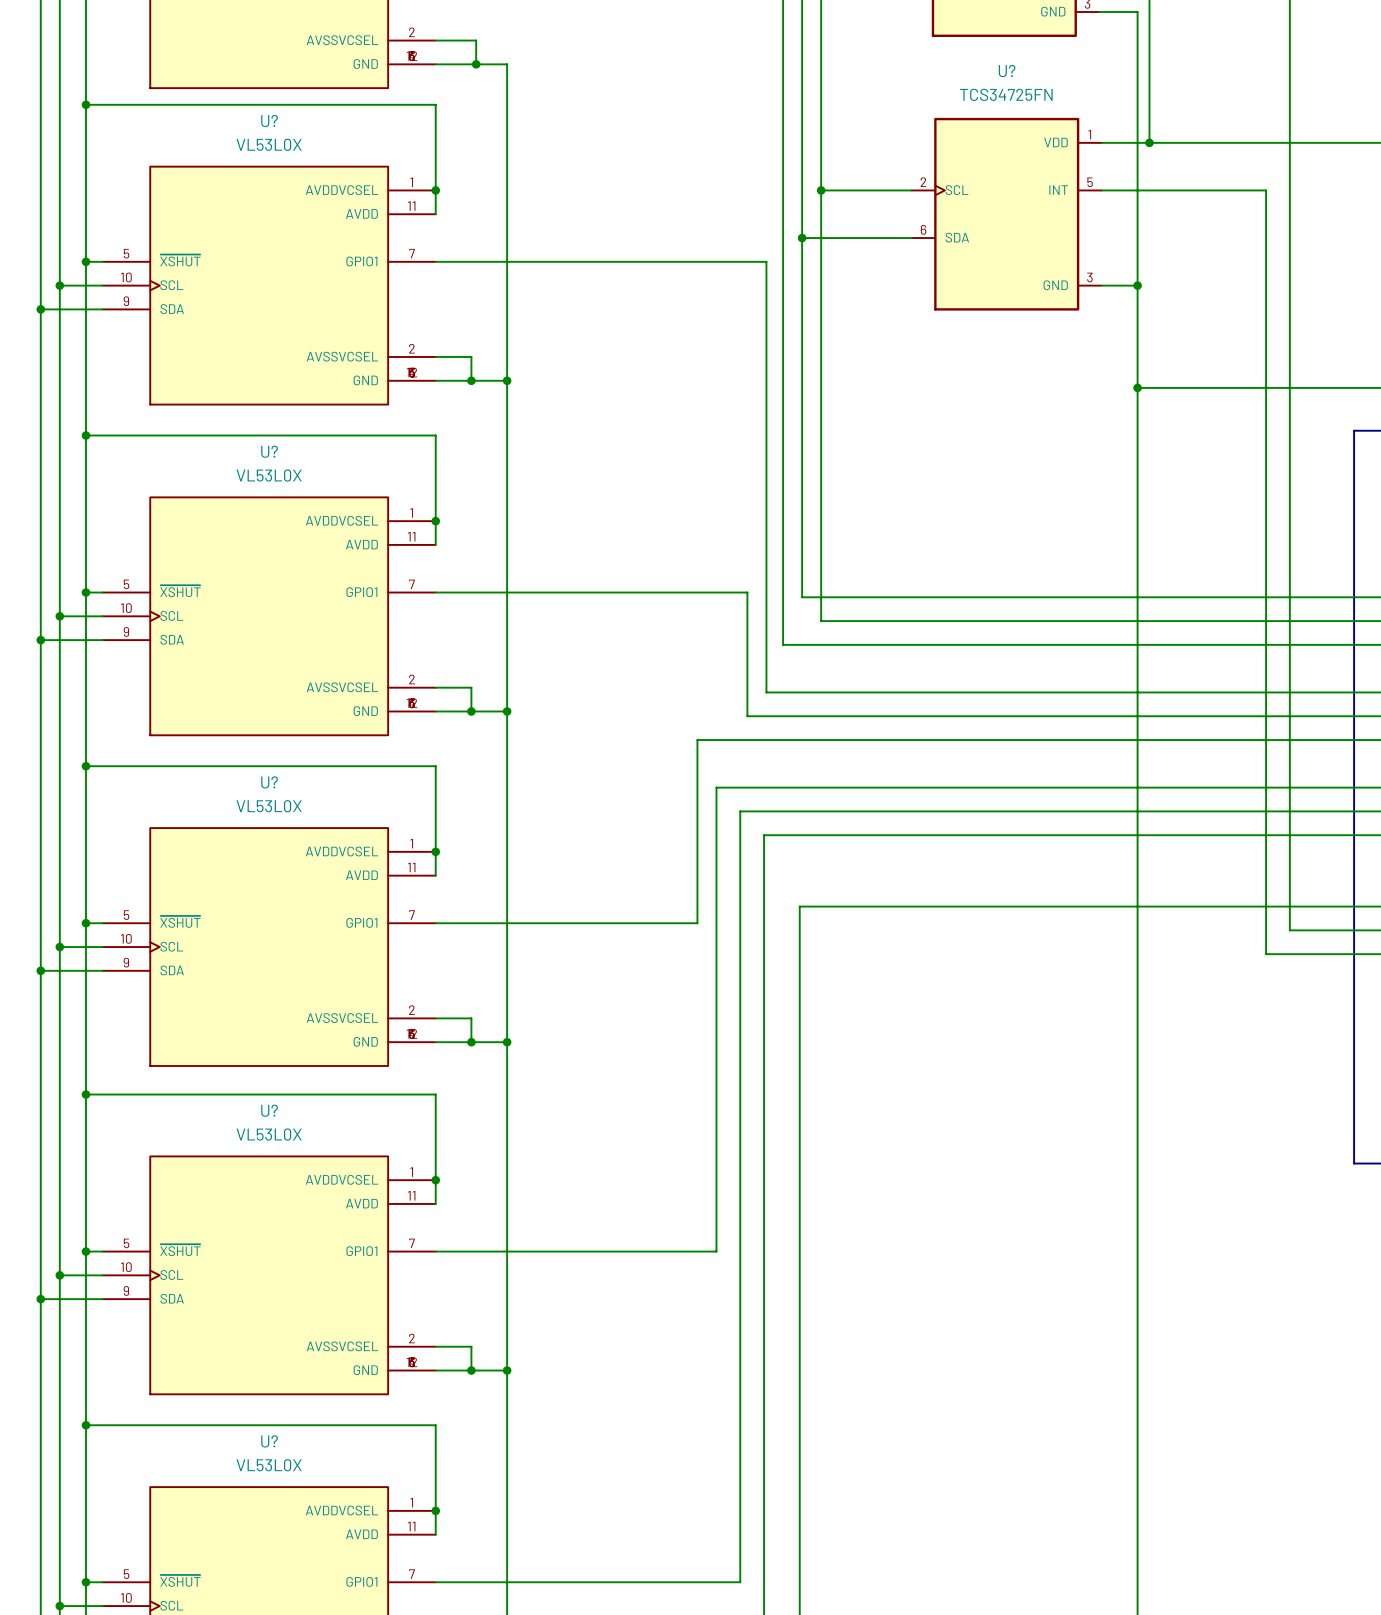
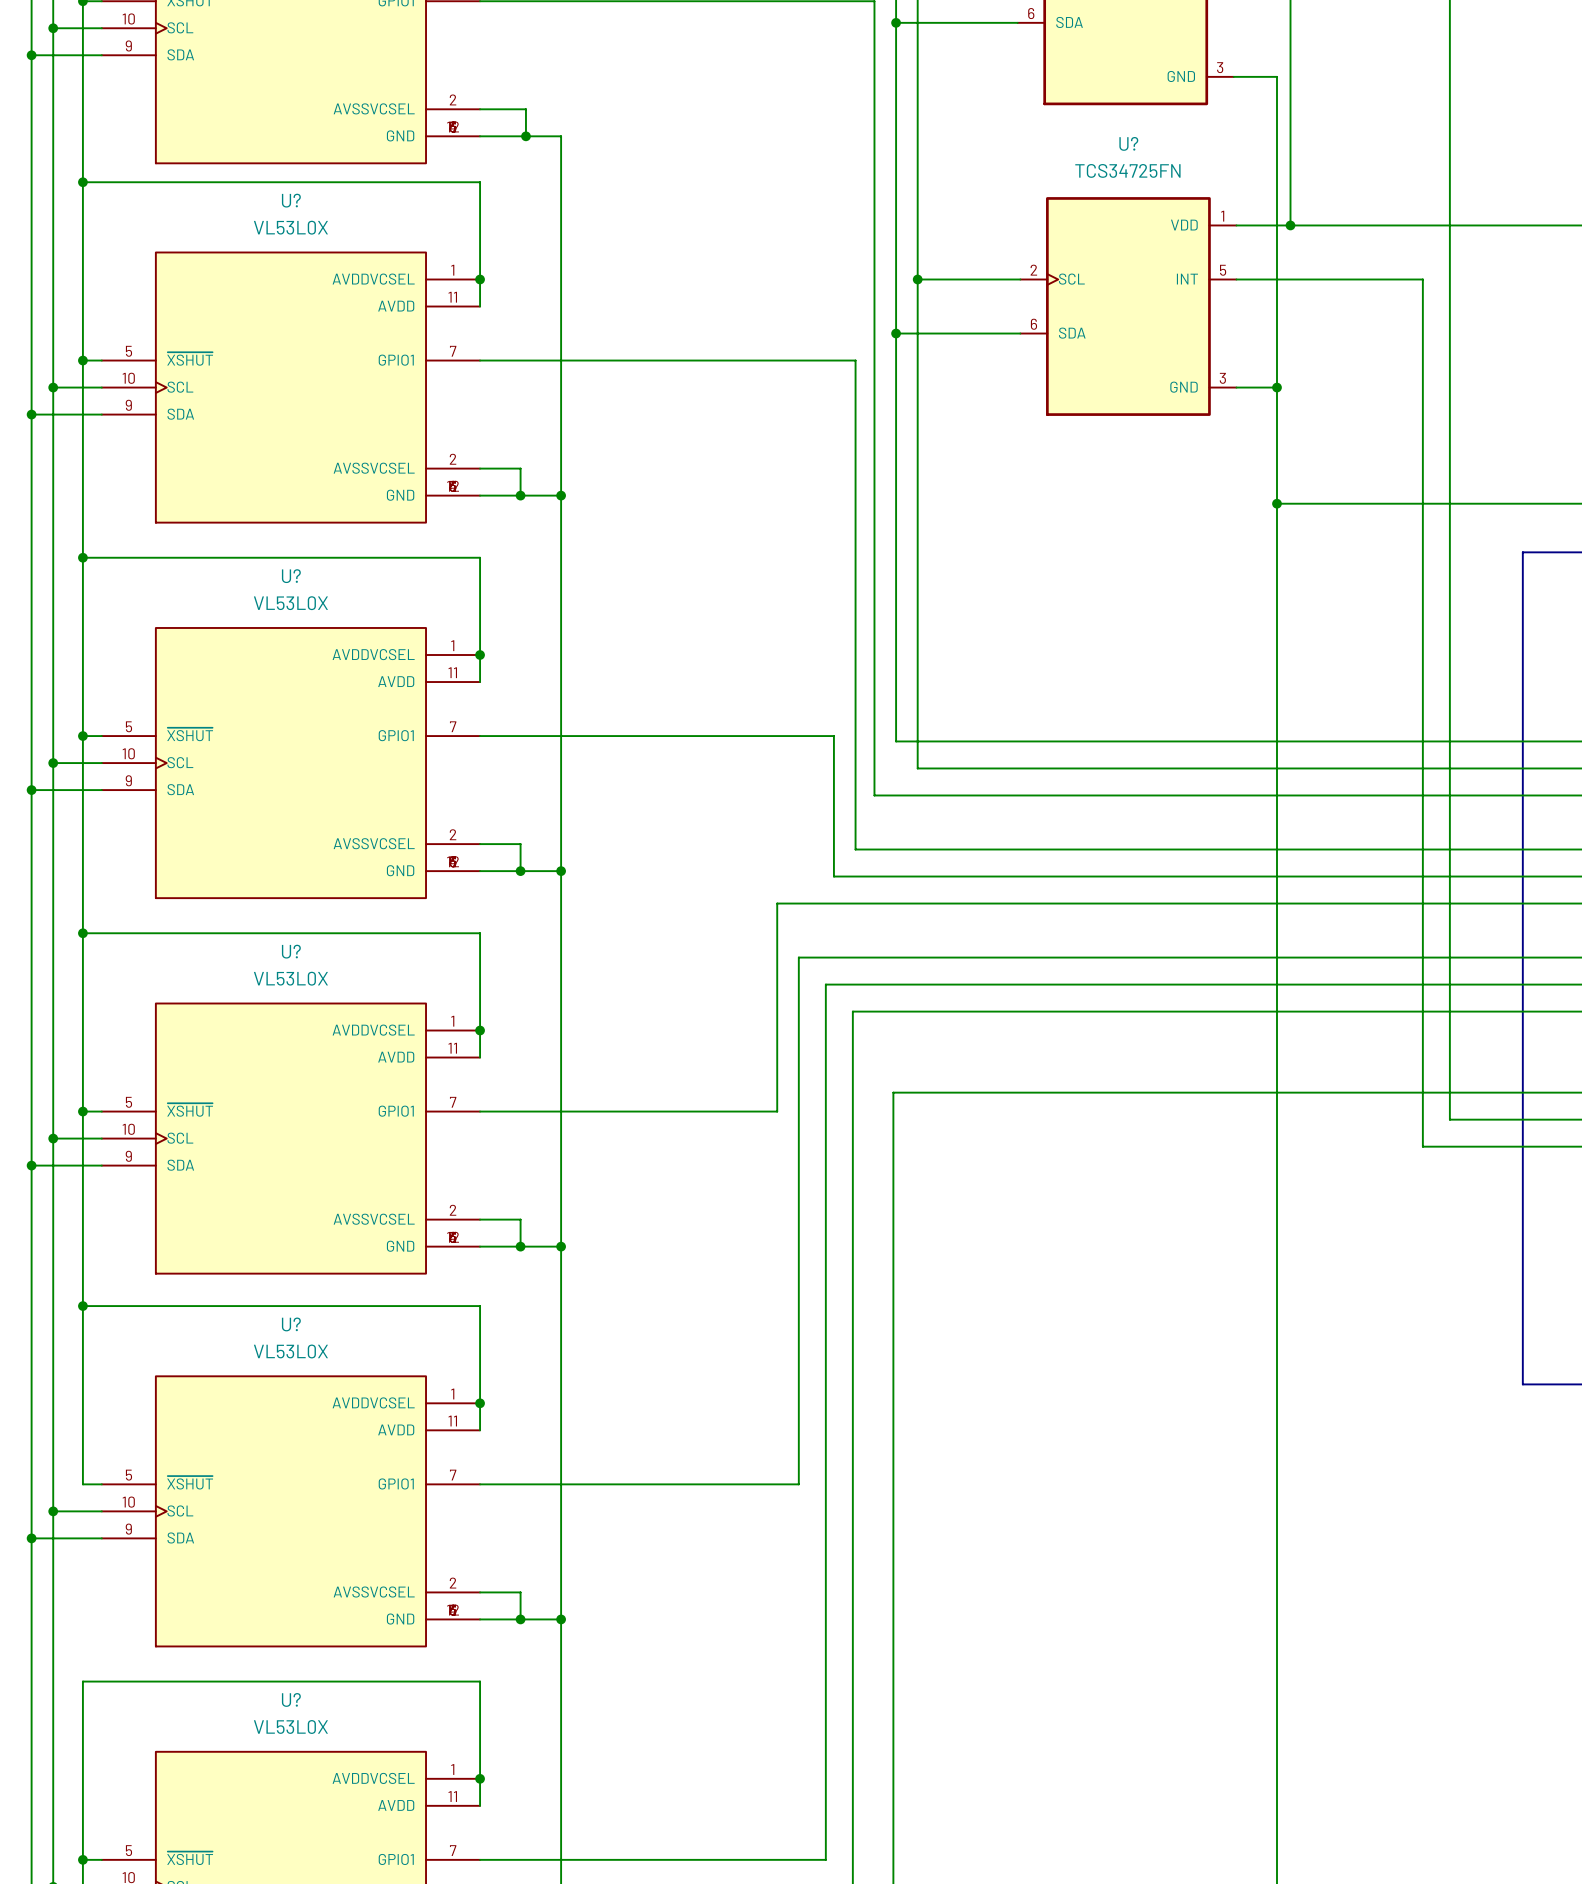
wire: (85, 1251) (85, 1425) -> none
junction: (85, 1251) -> none
junction: (85, 1425) -> none

